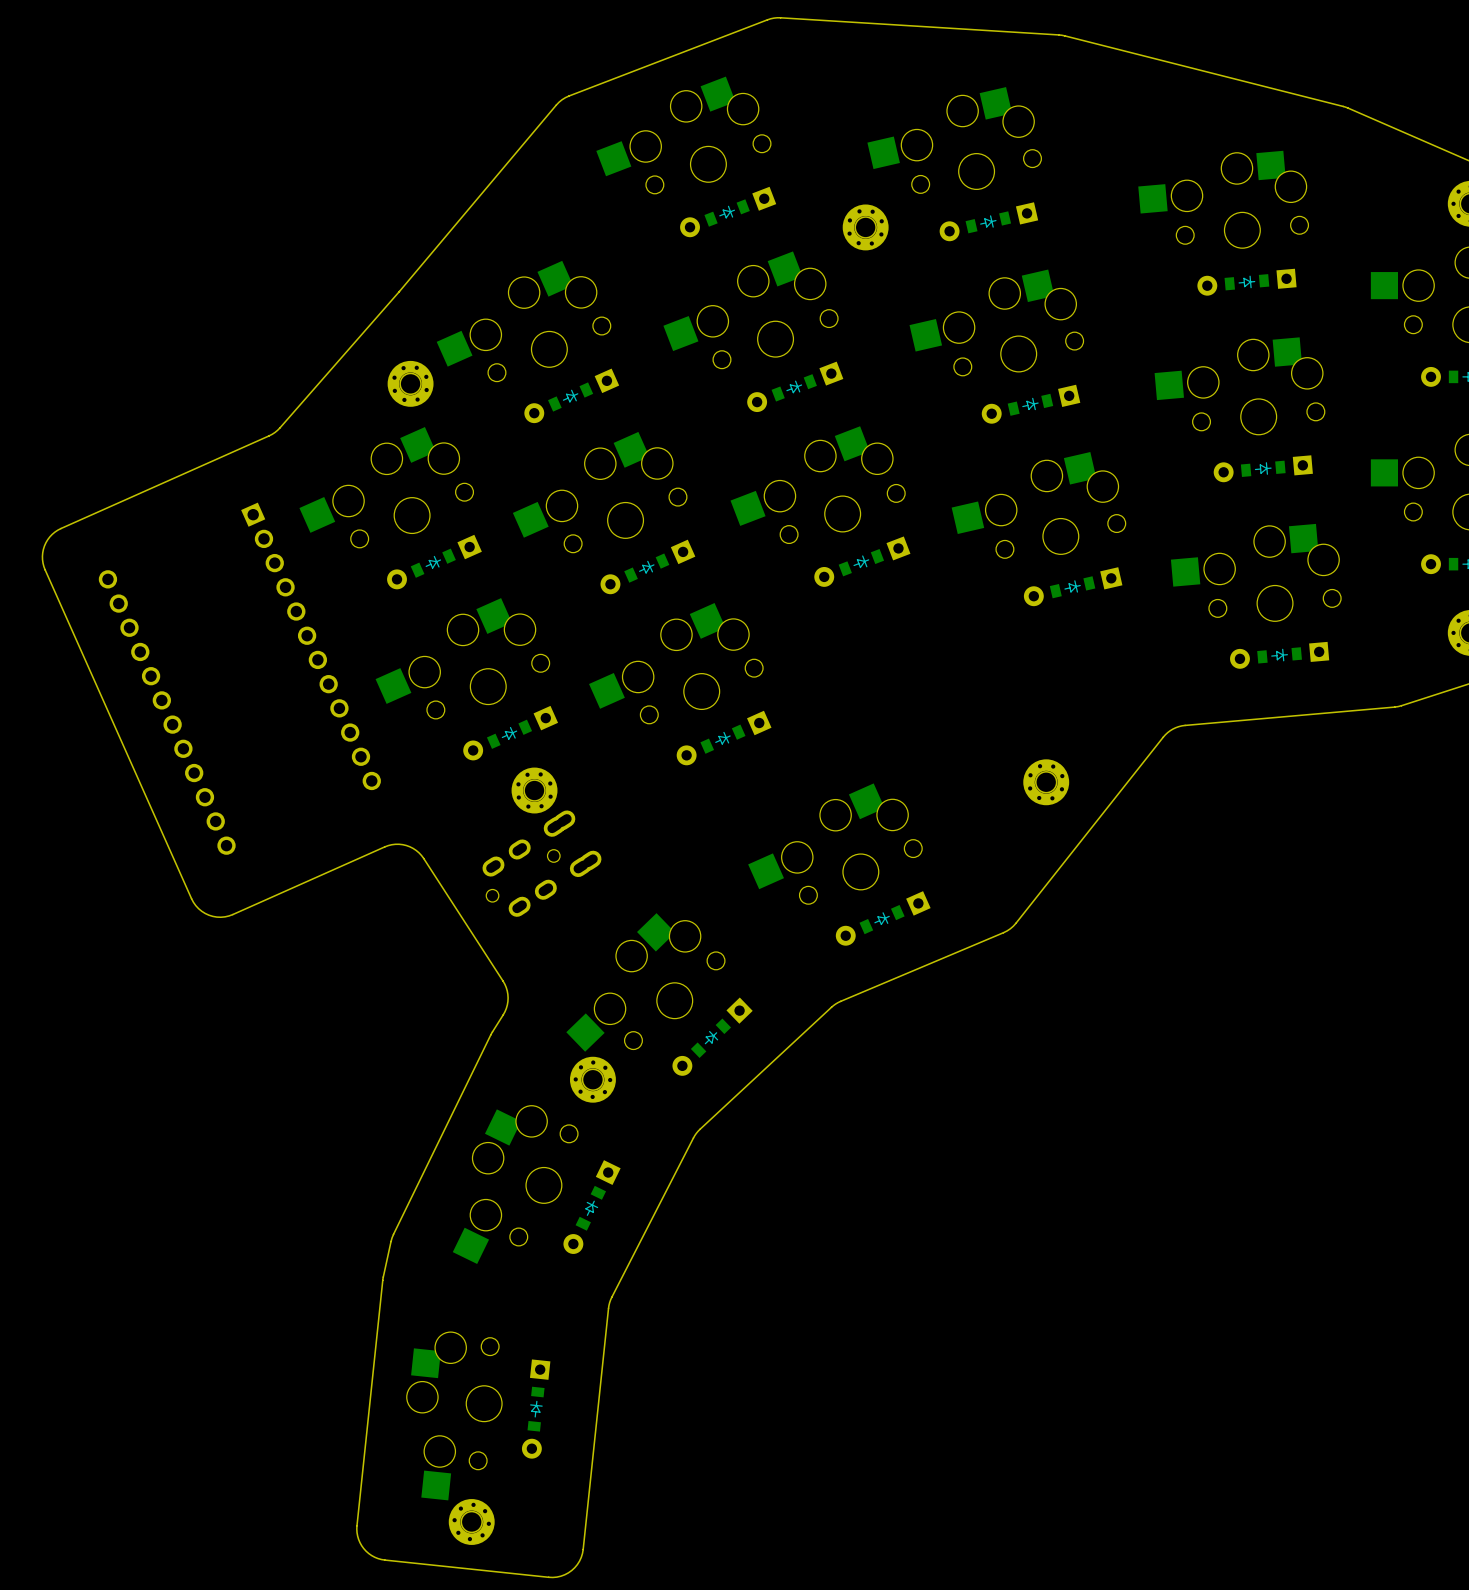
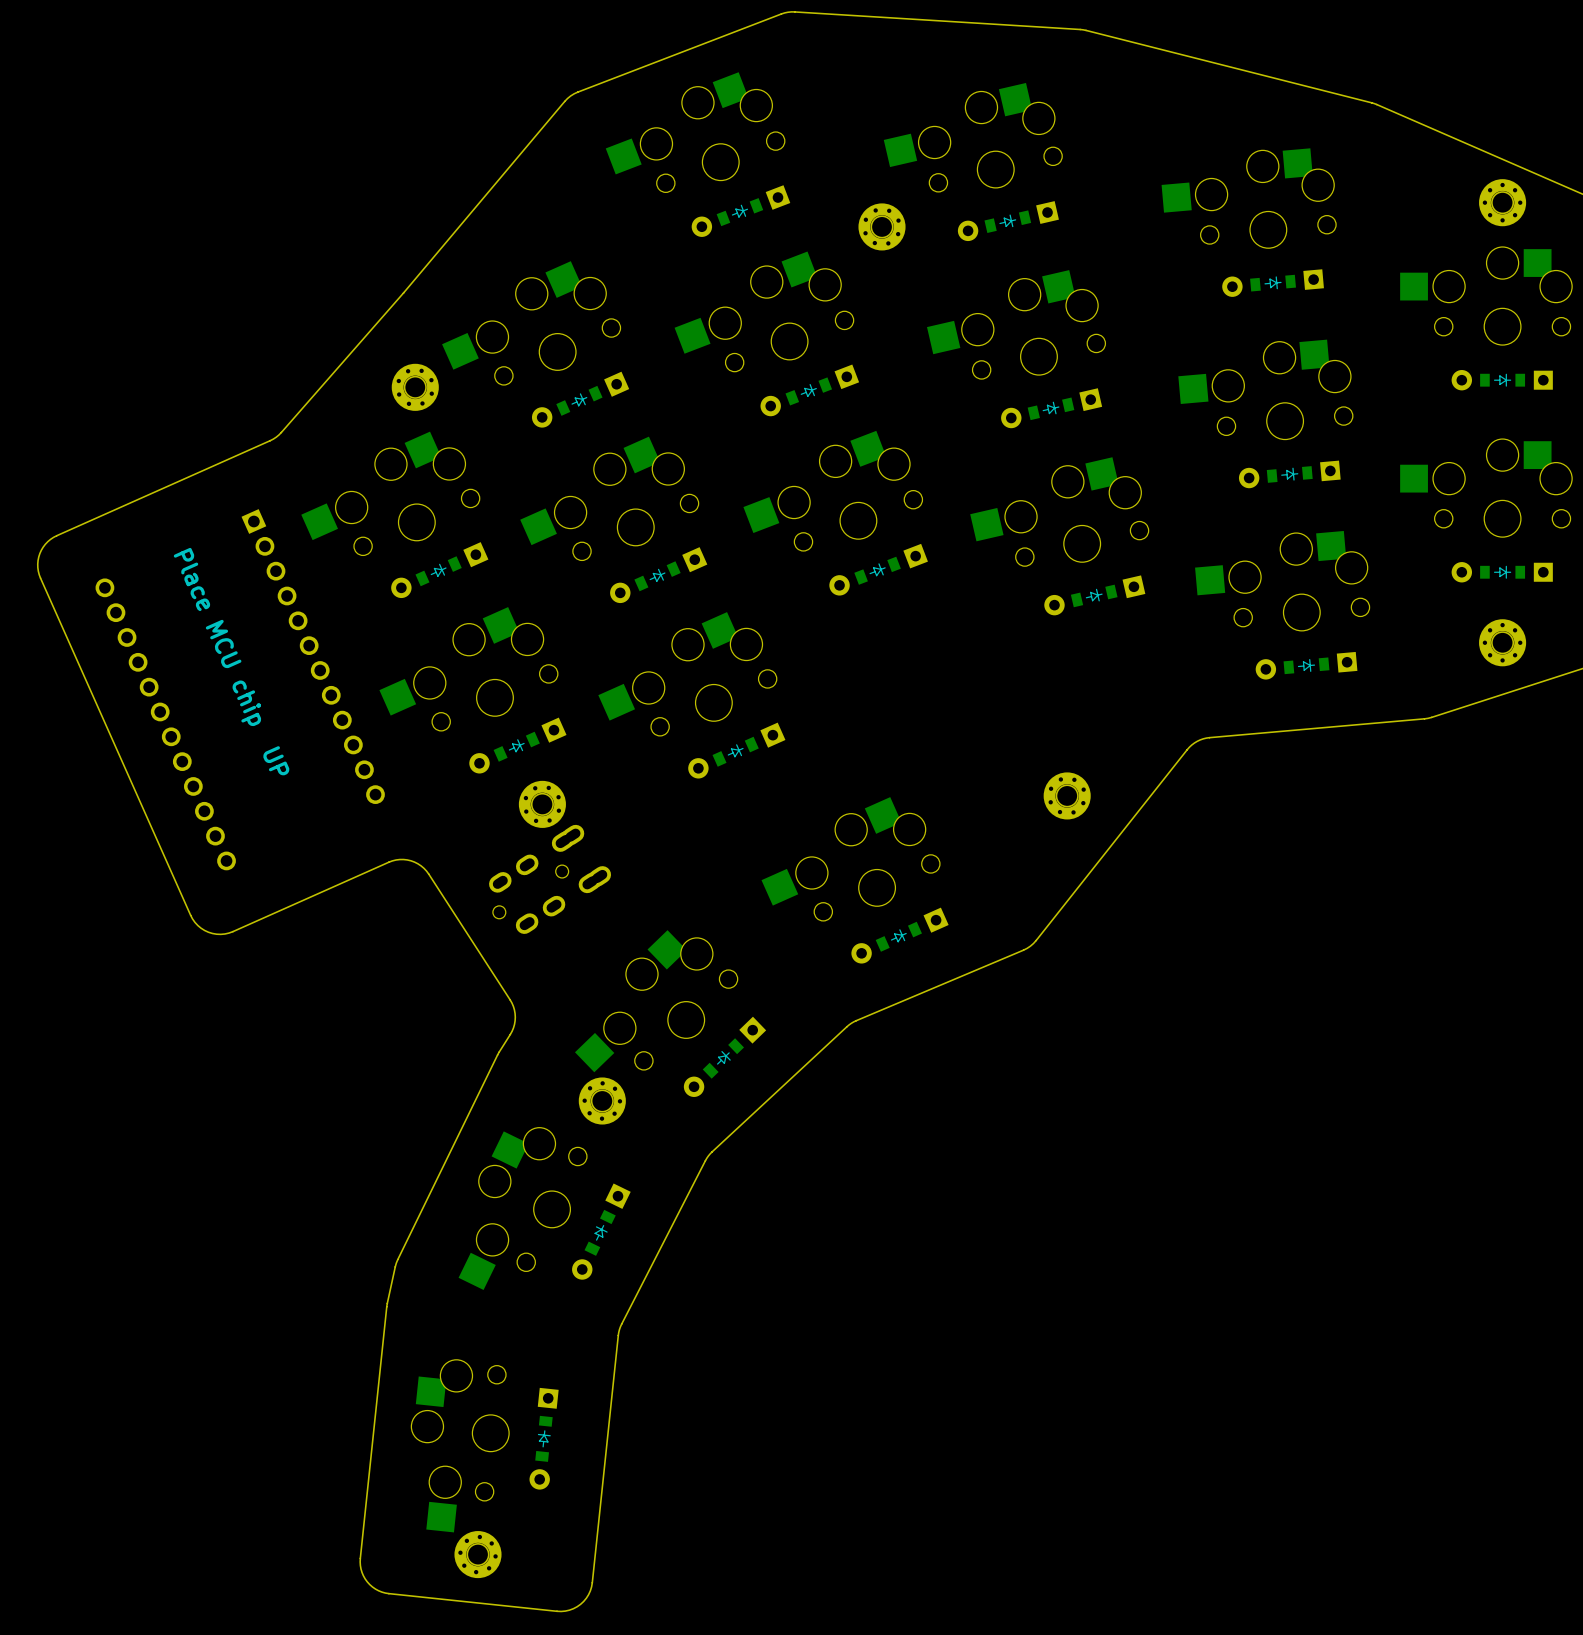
text: none -> Place MCU chip UP (231, 661)

